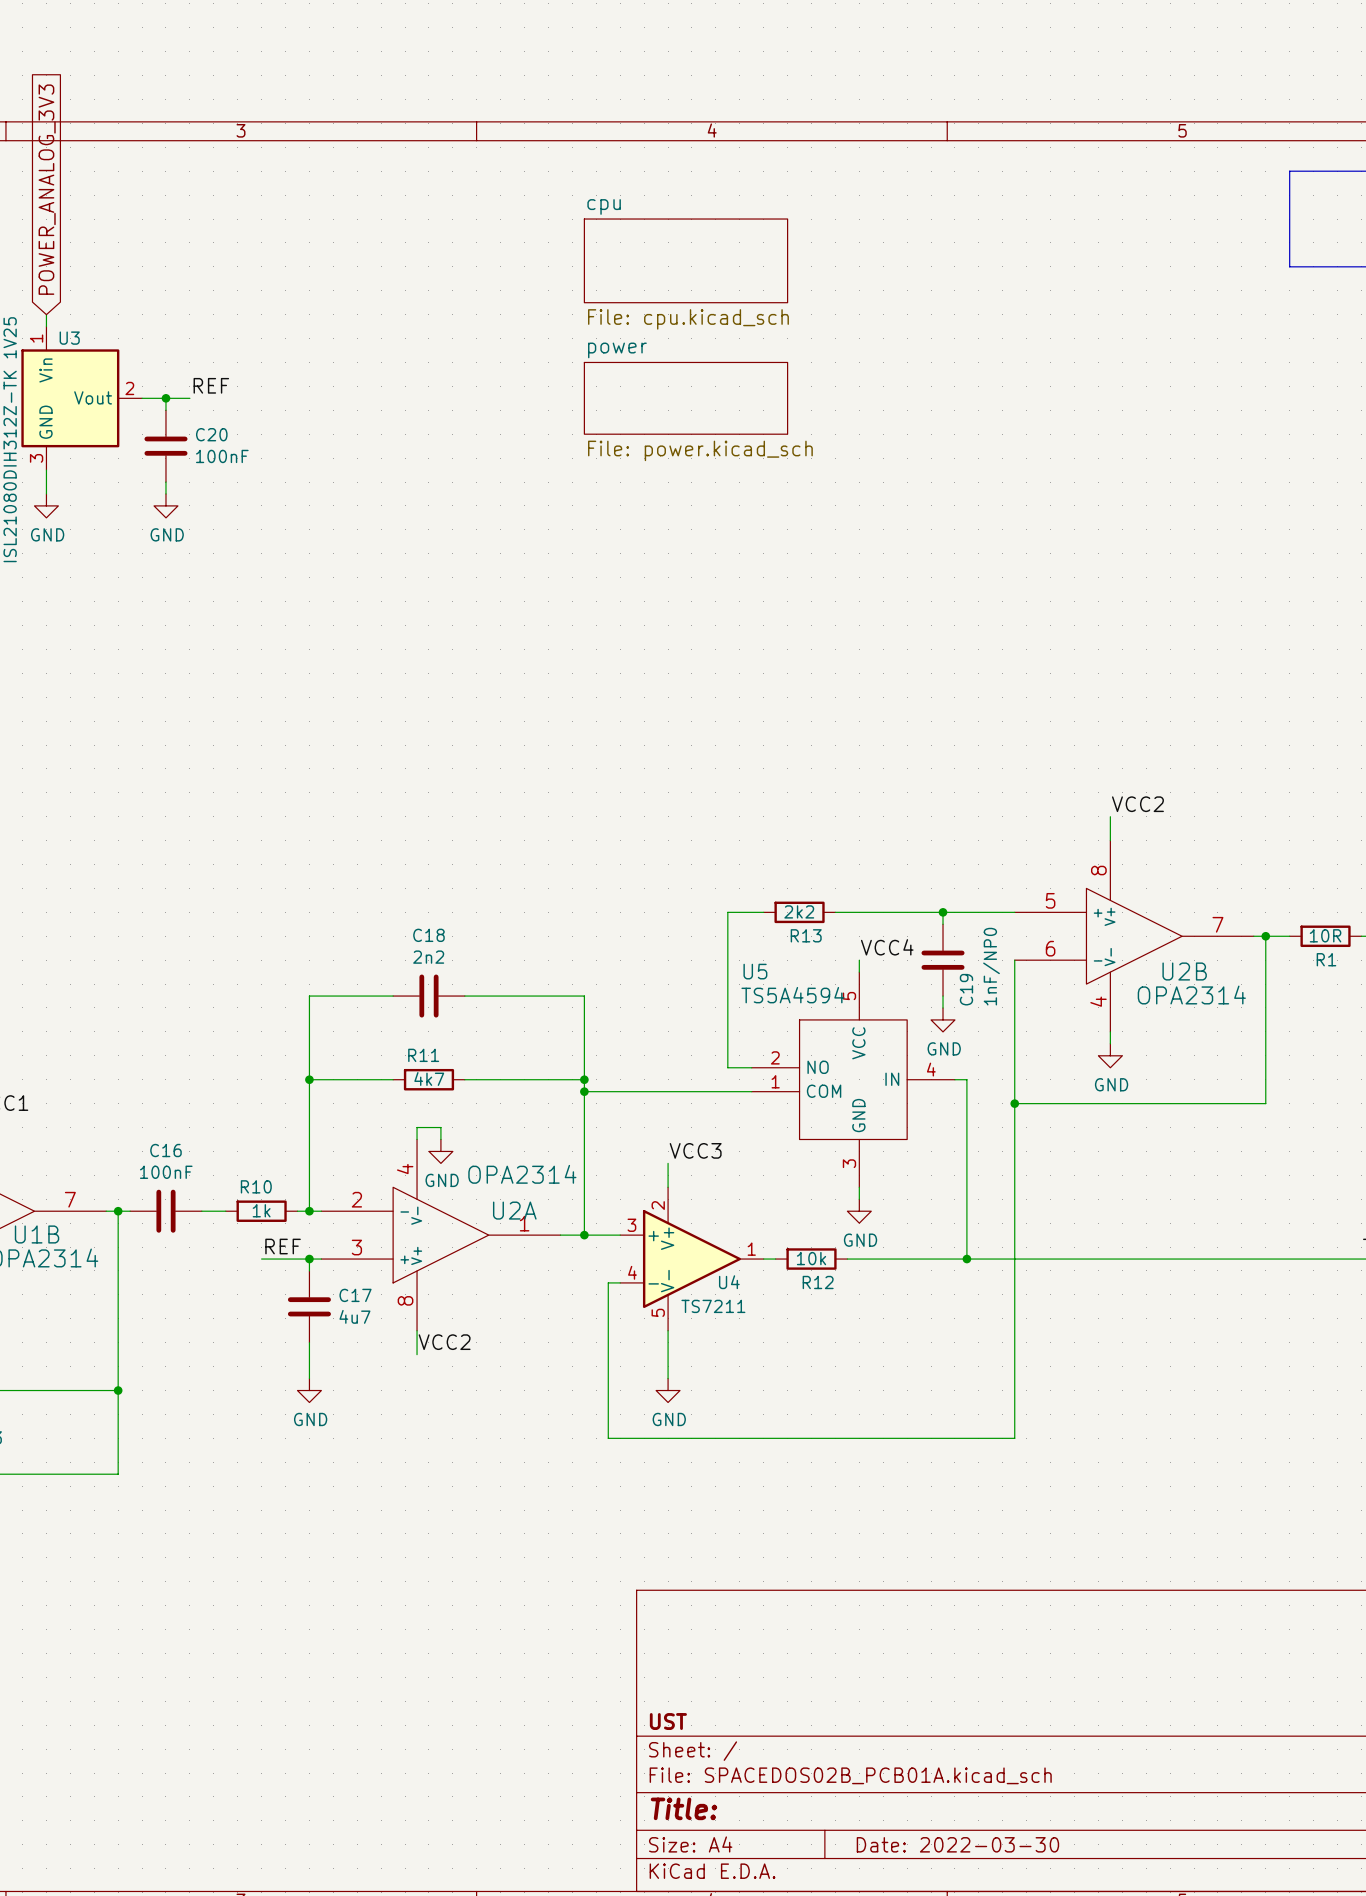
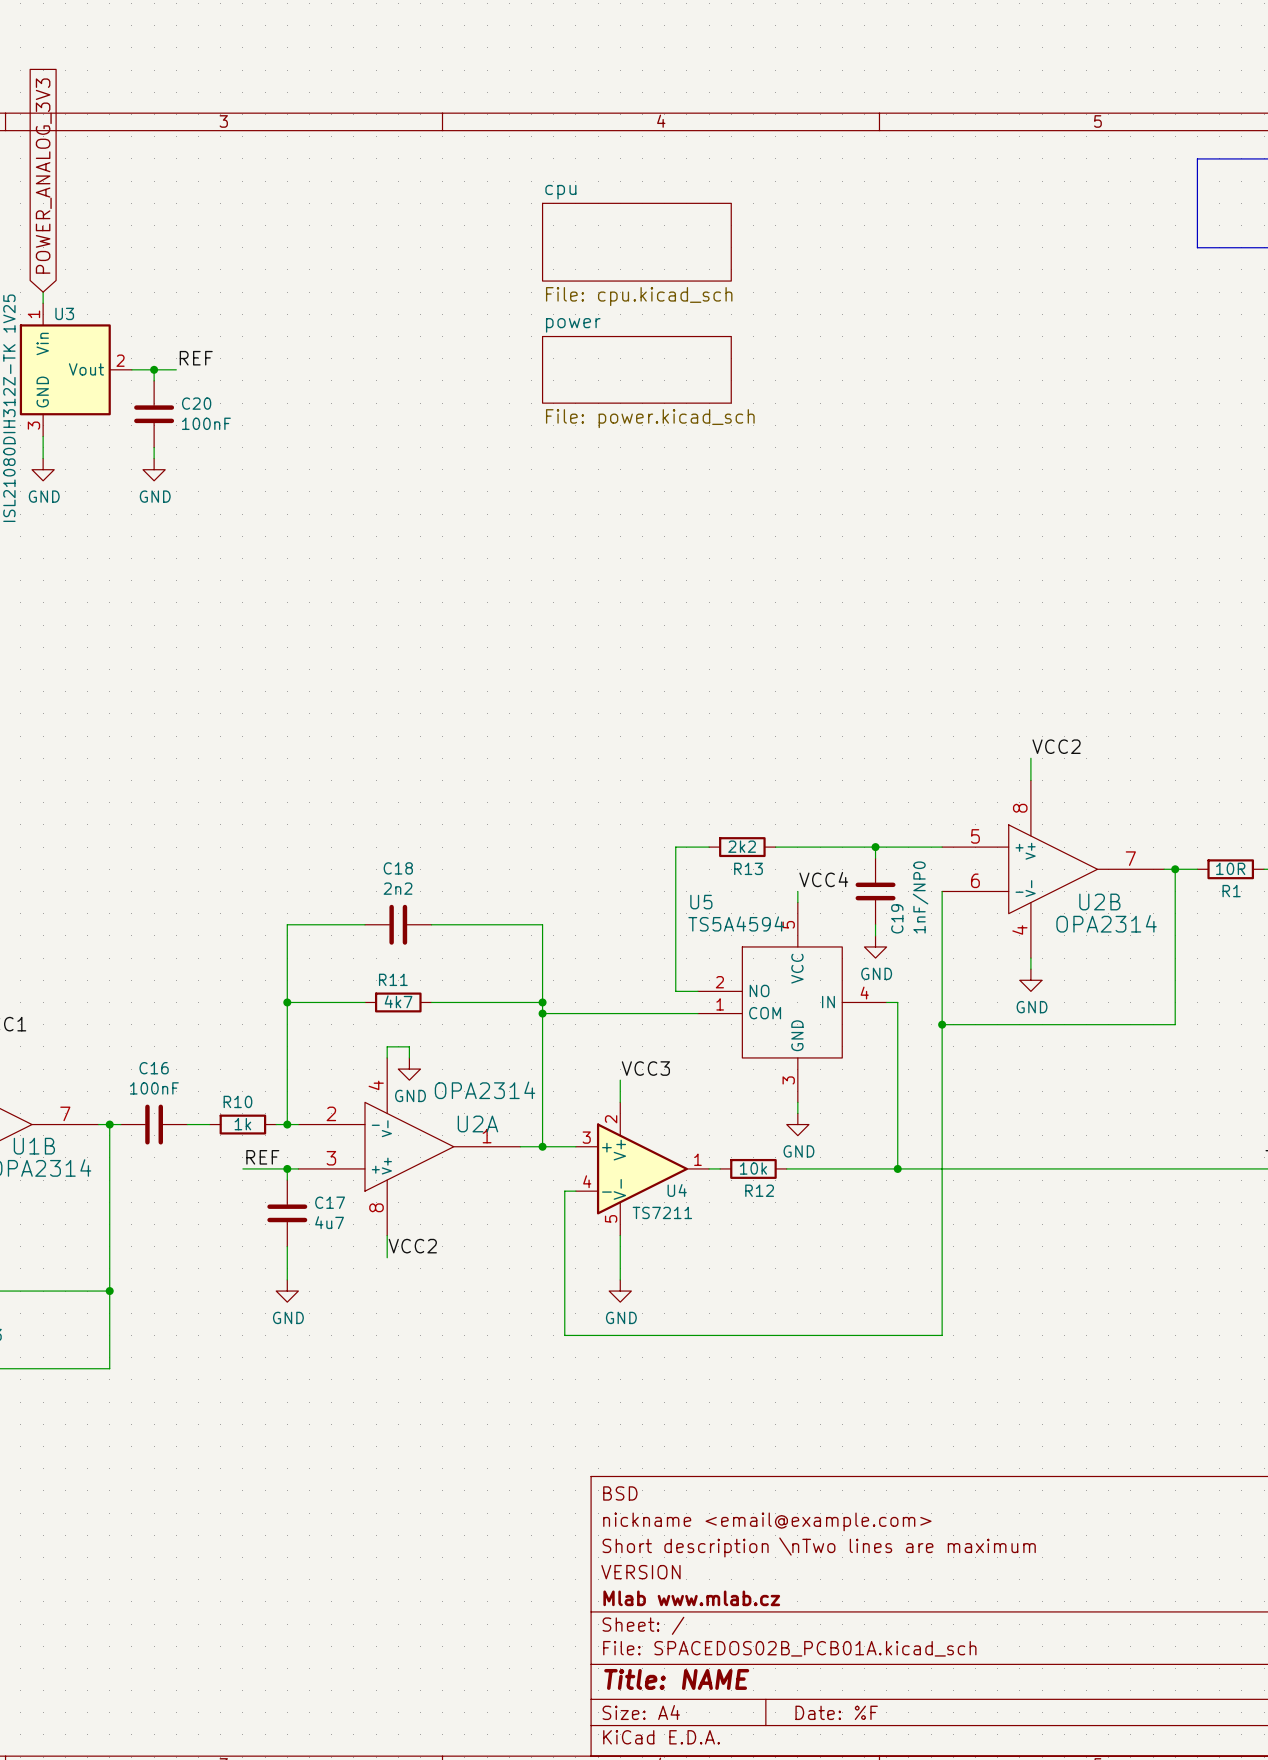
title block: none -> BSD (620, 1493)
title block: none -> nickname <email@example.com> (767, 1521)
title block: none -> Short description \nTwo lines are maximum (819, 1547)
title block: none -> VERSION (640, 1572)
title block: UST (668, 1721) -> Mlab www.mlab.cz (691, 1598)
title block: Title: (683, 1808) -> Title: NAME (676, 1679)
title block: Date: 2022-03-30 (957, 1844) -> Date: %F (836, 1712)

